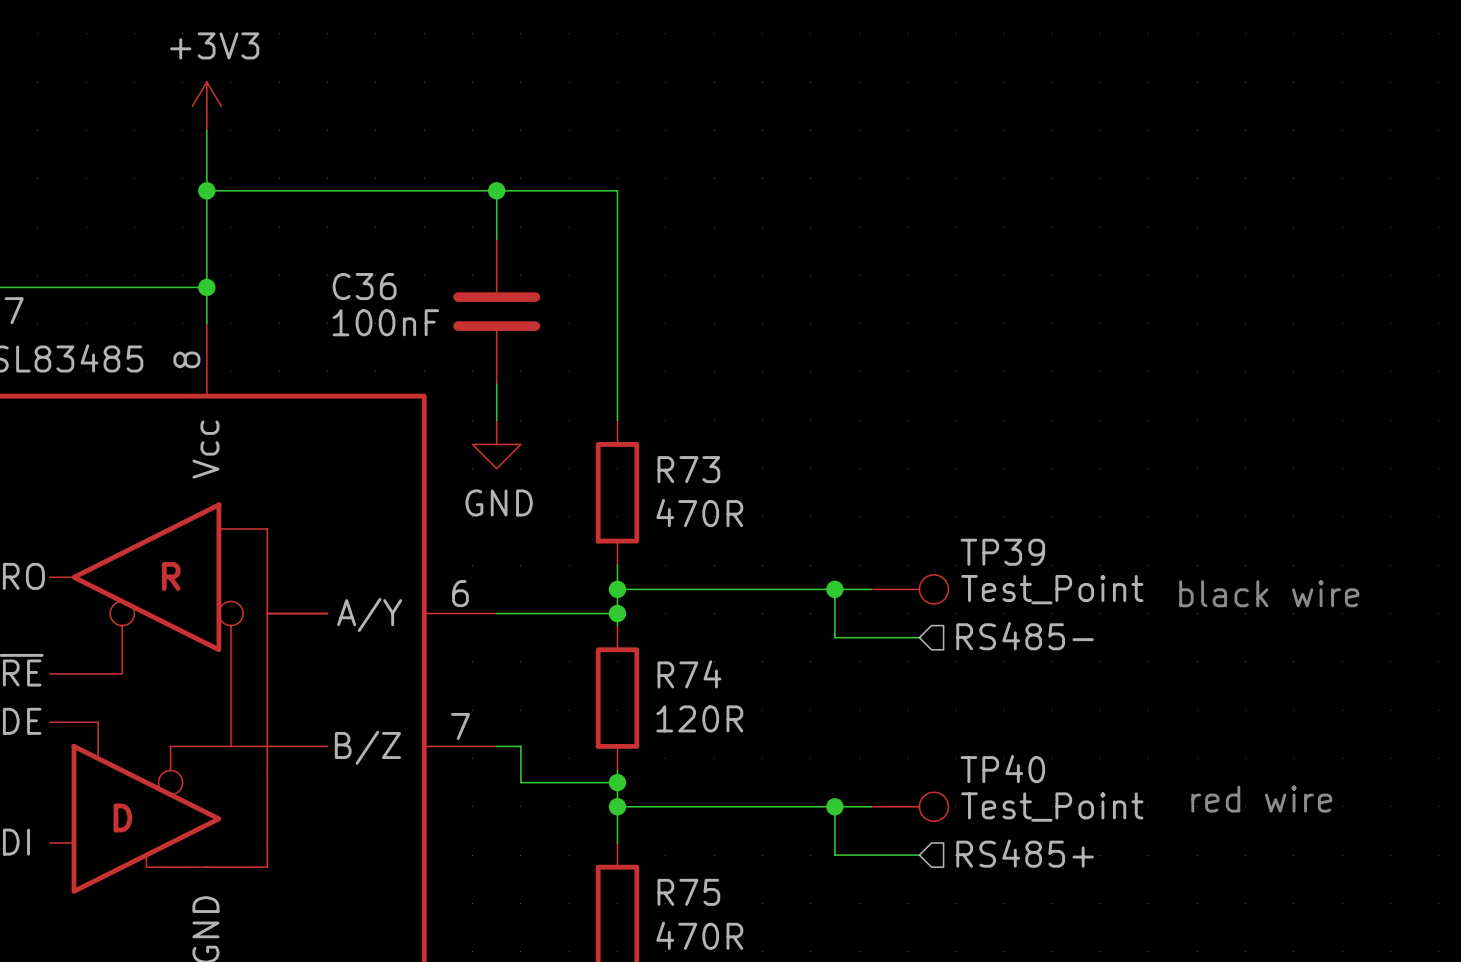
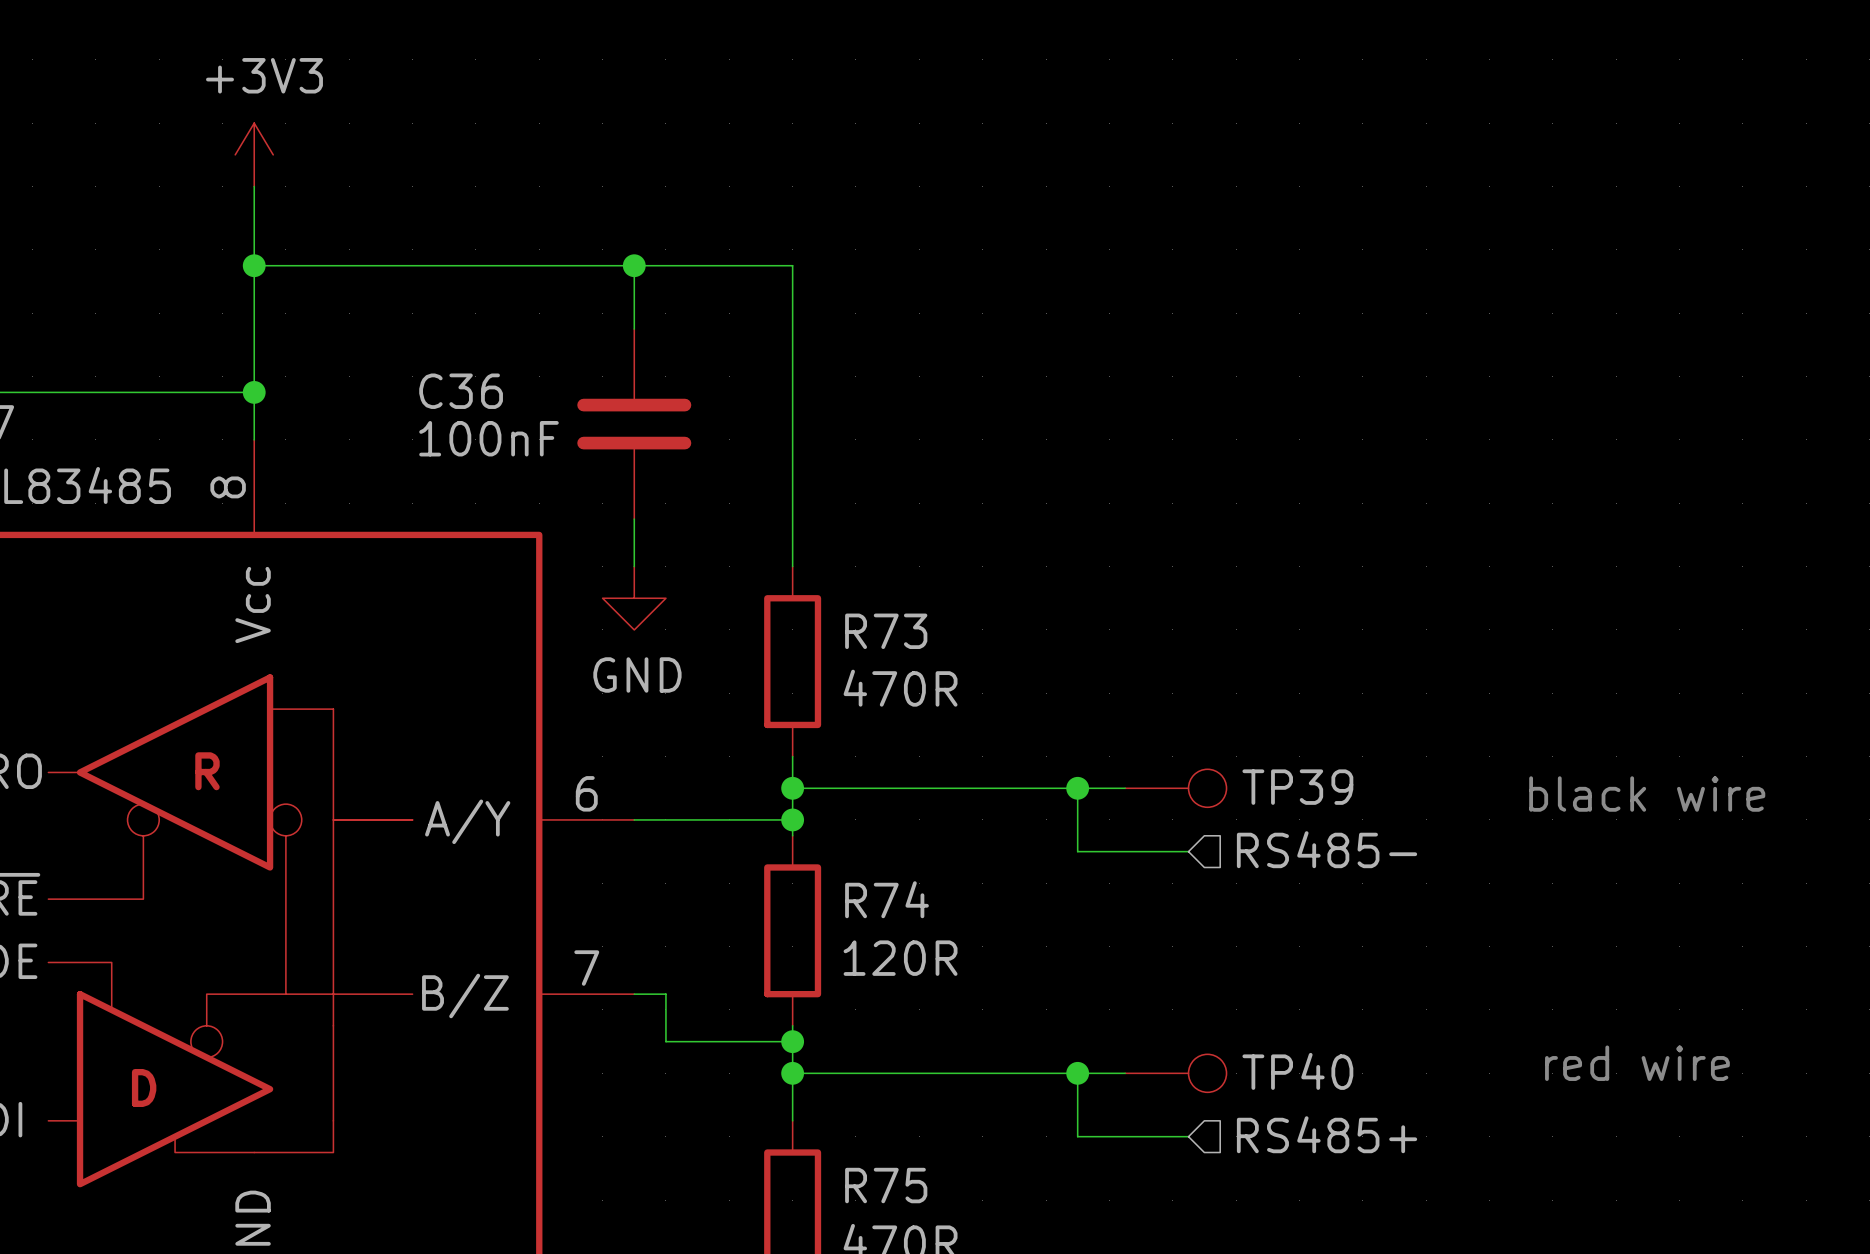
TP39 name position: TP39 (1002, 552) -> TP39 (1297, 787)
TP39 value: Test_Point (1052, 589) -> none
TP40 name position: TP40 (1002, 769) -> TP40 (1297, 1071)
TP40 value: Test_Point (1052, 807) -> none

